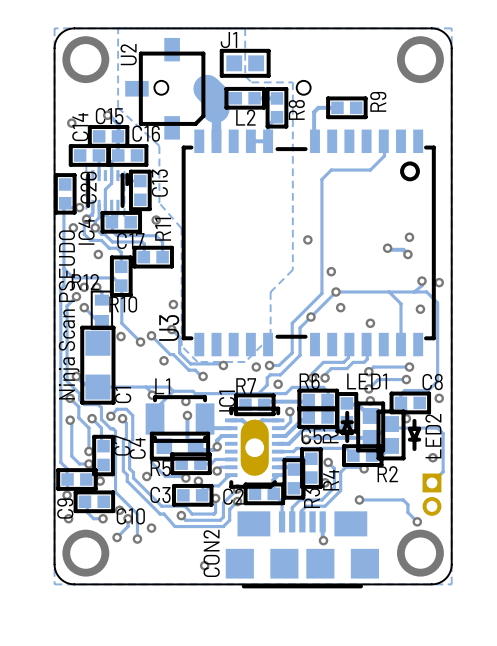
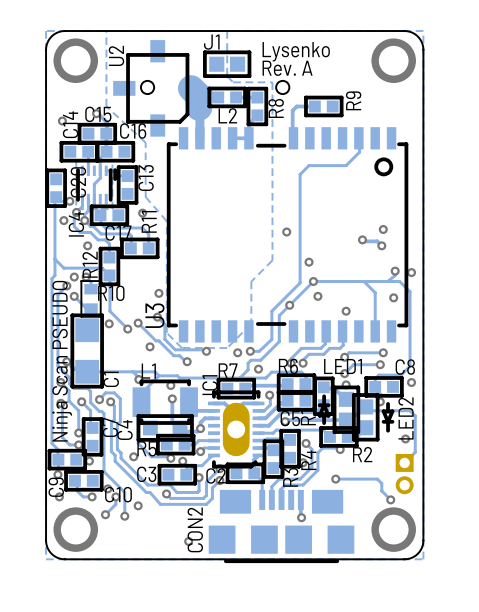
text: none -> Lysenko (296, 51)
text: none -> Rev. A (287, 68)
R12 name rotation: 0° (85, 282) -> 90° counterclockwise (90, 264)
text position: Ninja Scan PSEUDO (69, 314) -> Ninja Scan PSEUDO (62, 361)

